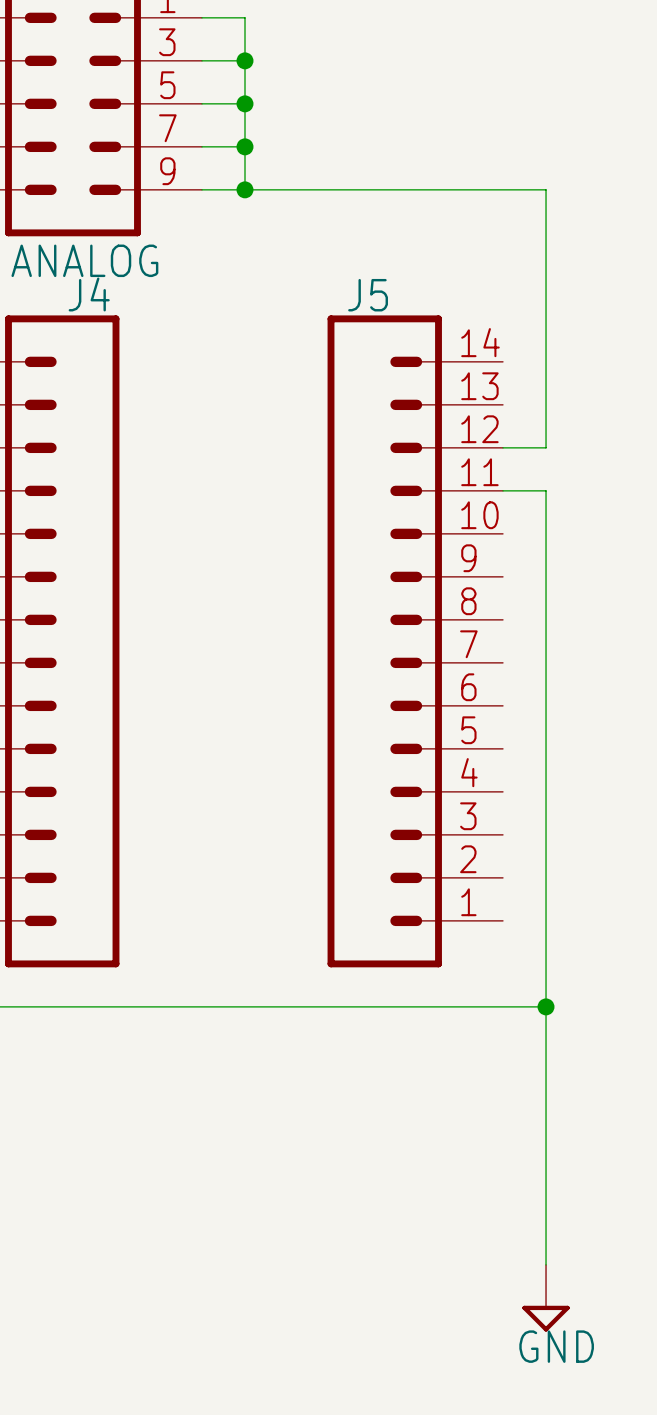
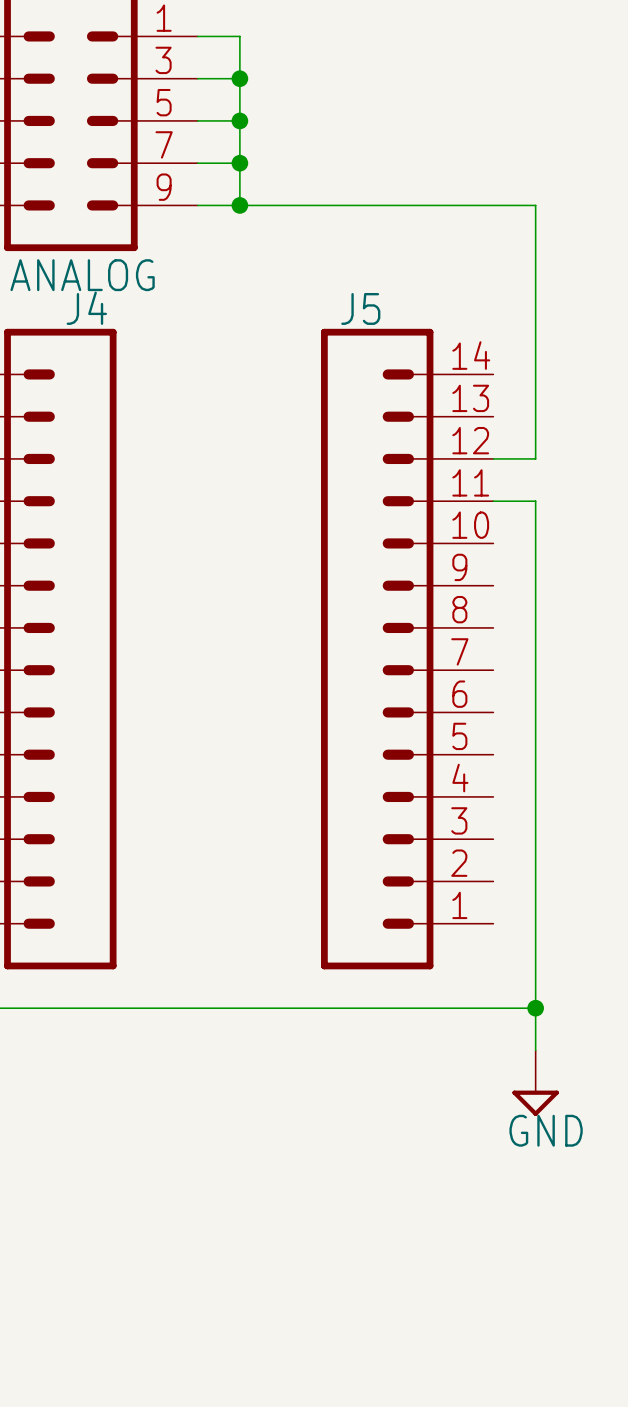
wire: (546, 1049) (546, 1264) -> none
power symbol position: GND (546, 1298) -> GND (535, 1083)

